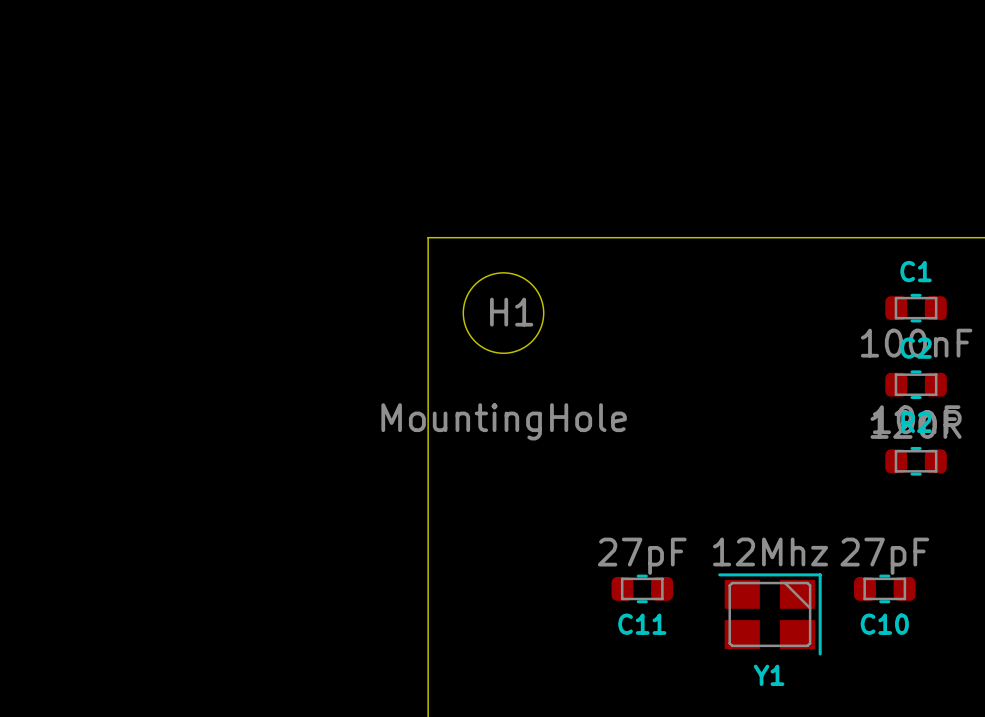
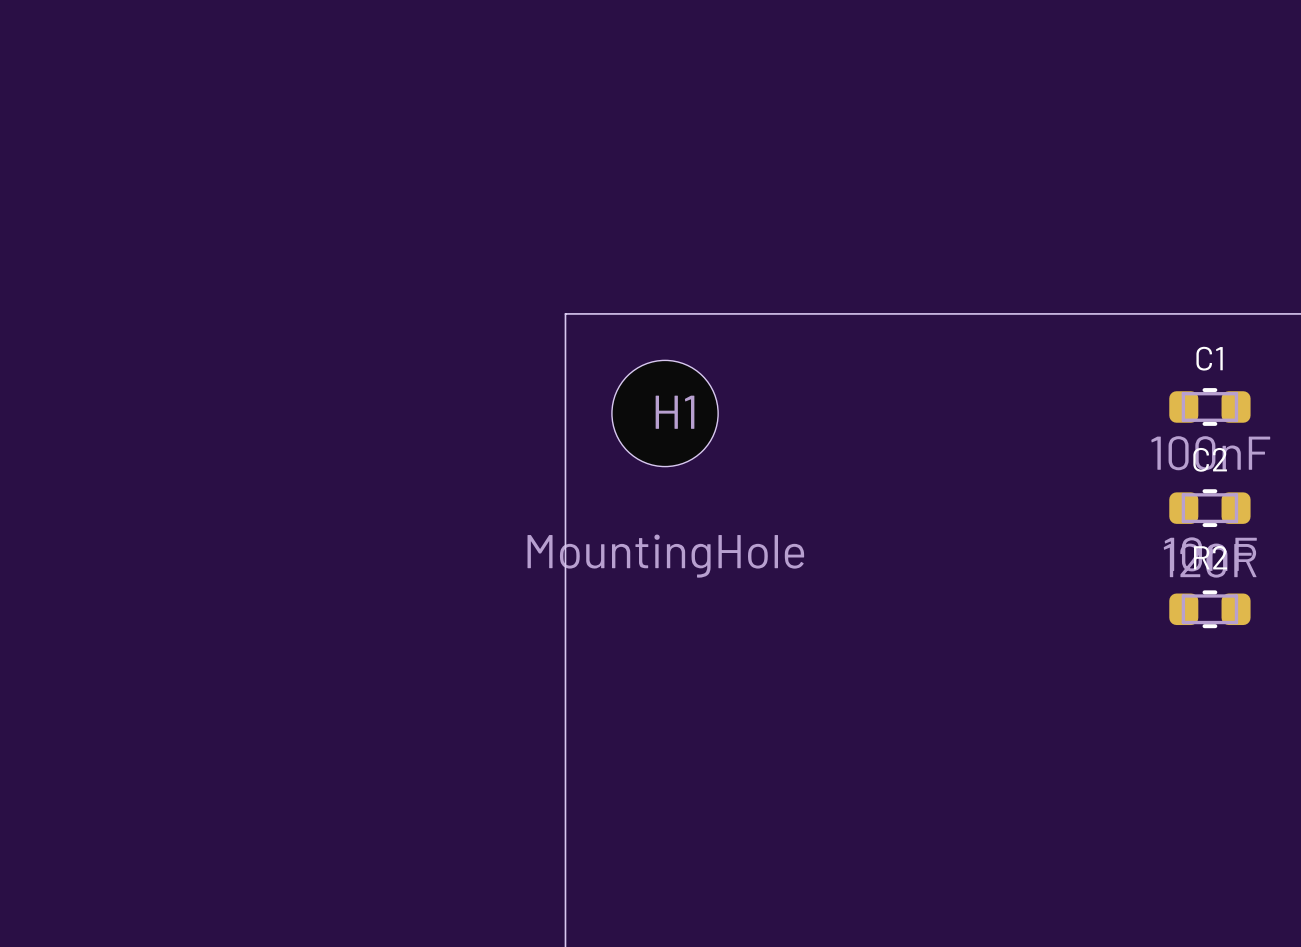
C11: 27pF (642, 588) -> none
C10: 27pF (884, 588) -> none
Y1: 12Mhz (769, 614) -> none

